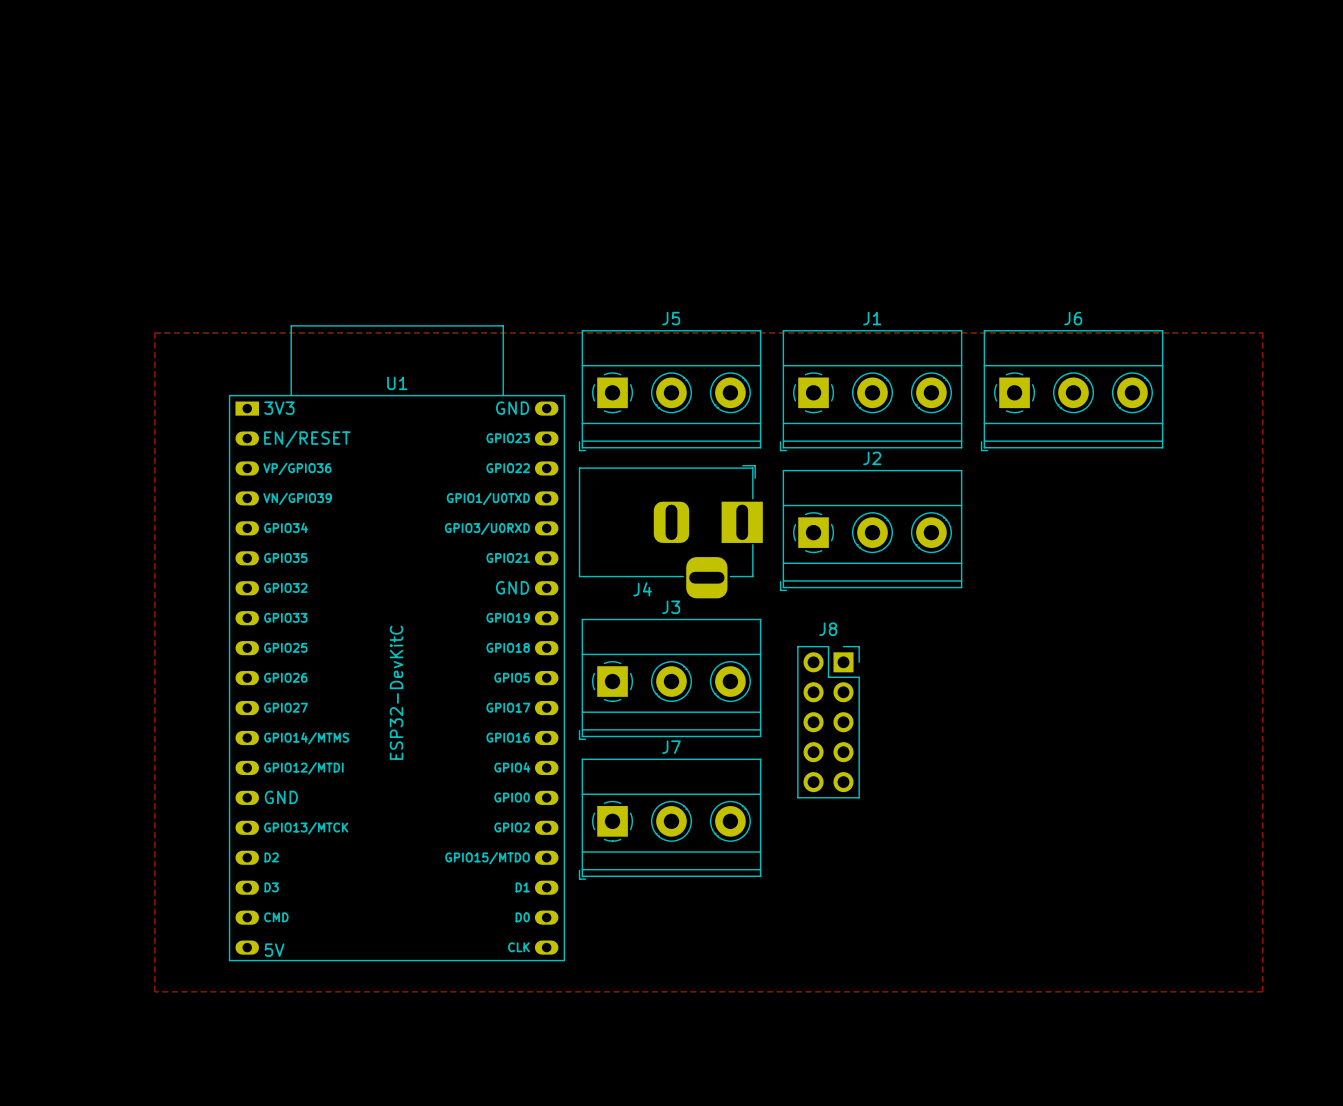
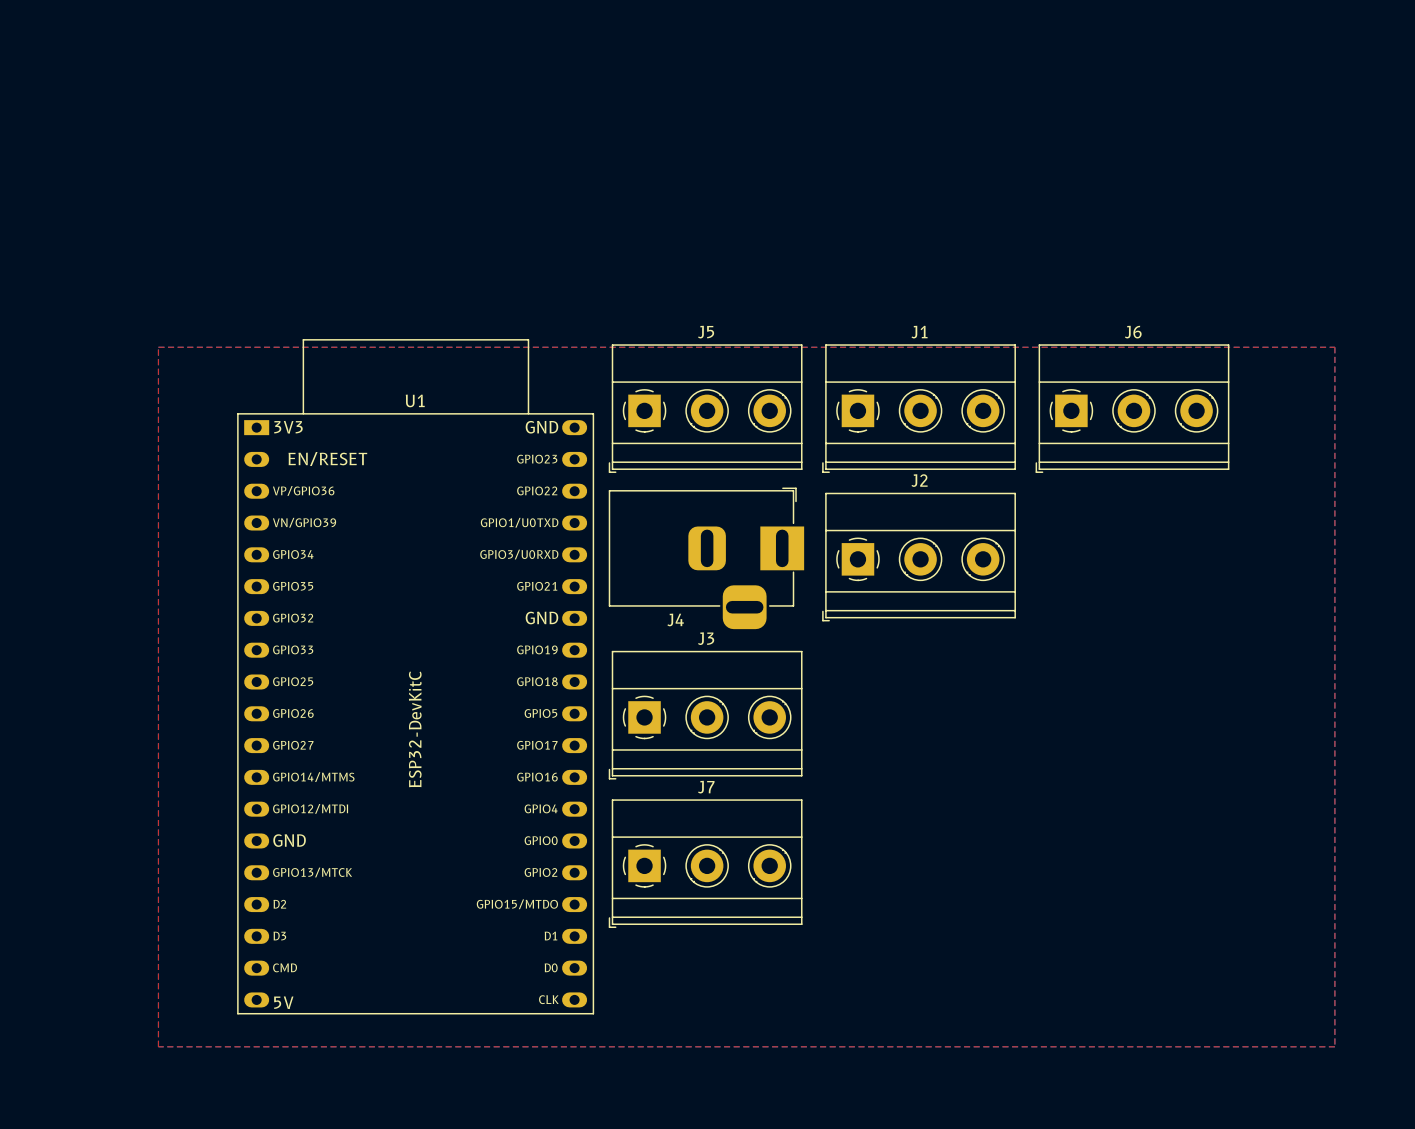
J8: (828, 722) -> none

